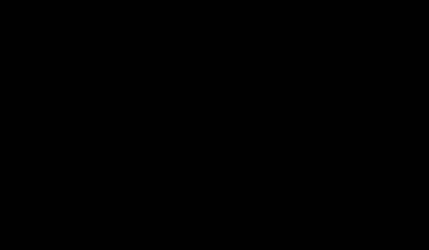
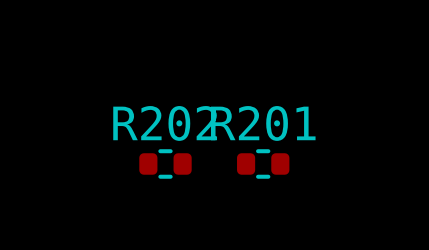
R202: none -> (165, 163)
R201: none -> (263, 163)

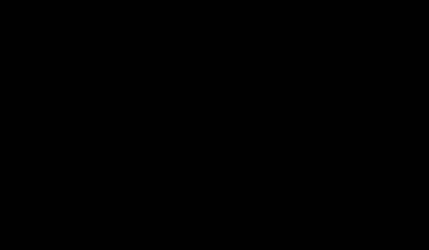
R202: (165, 163) -> none
R201: (263, 163) -> none

